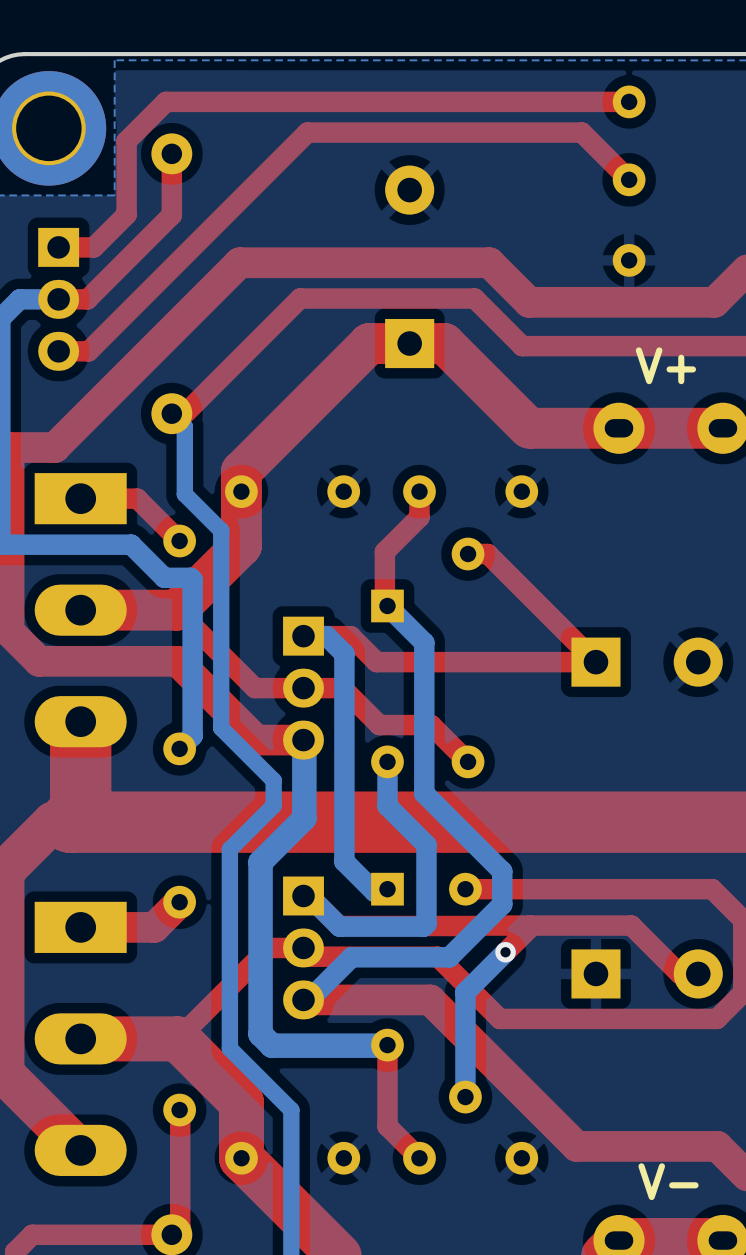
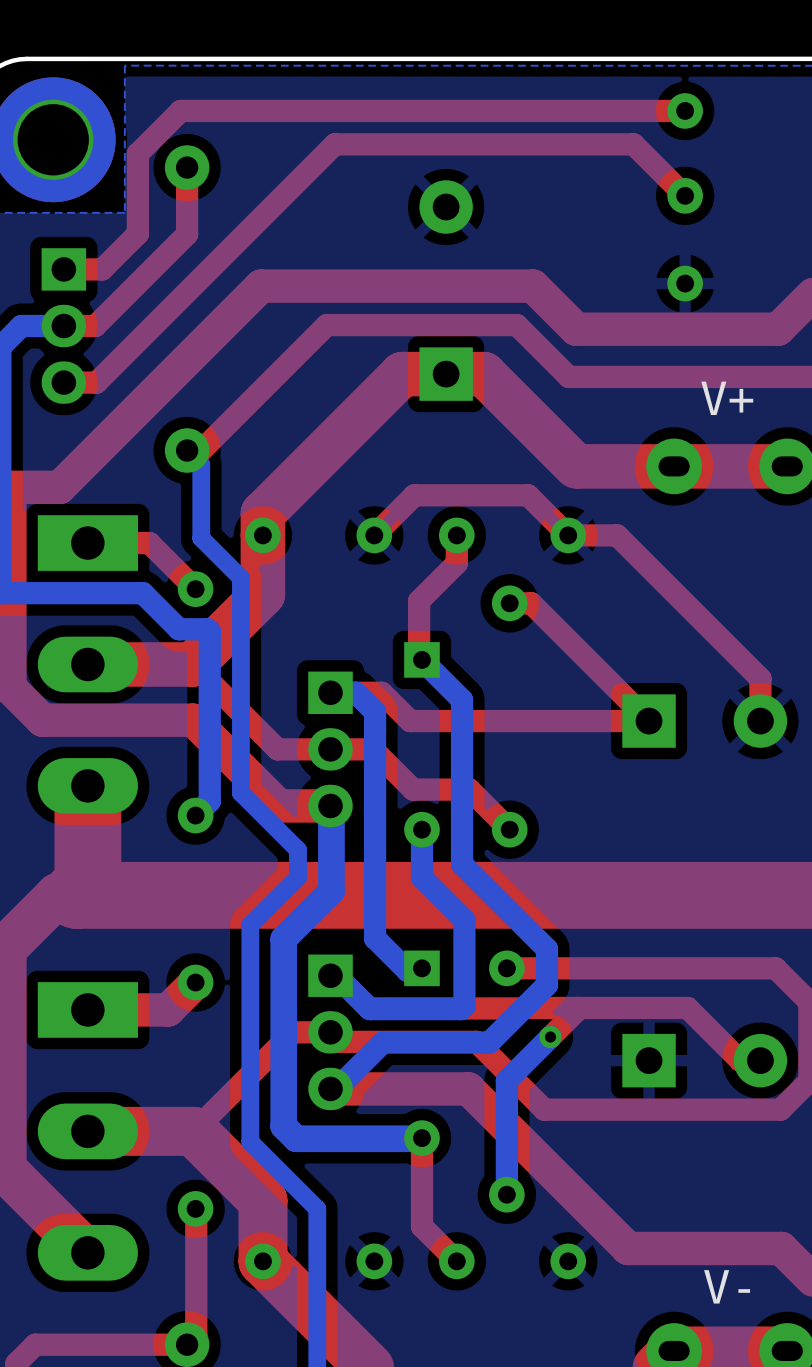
top track: none -> (374, 535) (414, 495) (528, 495) (568, 535) (617, 535) (760, 678) (760, 721)

